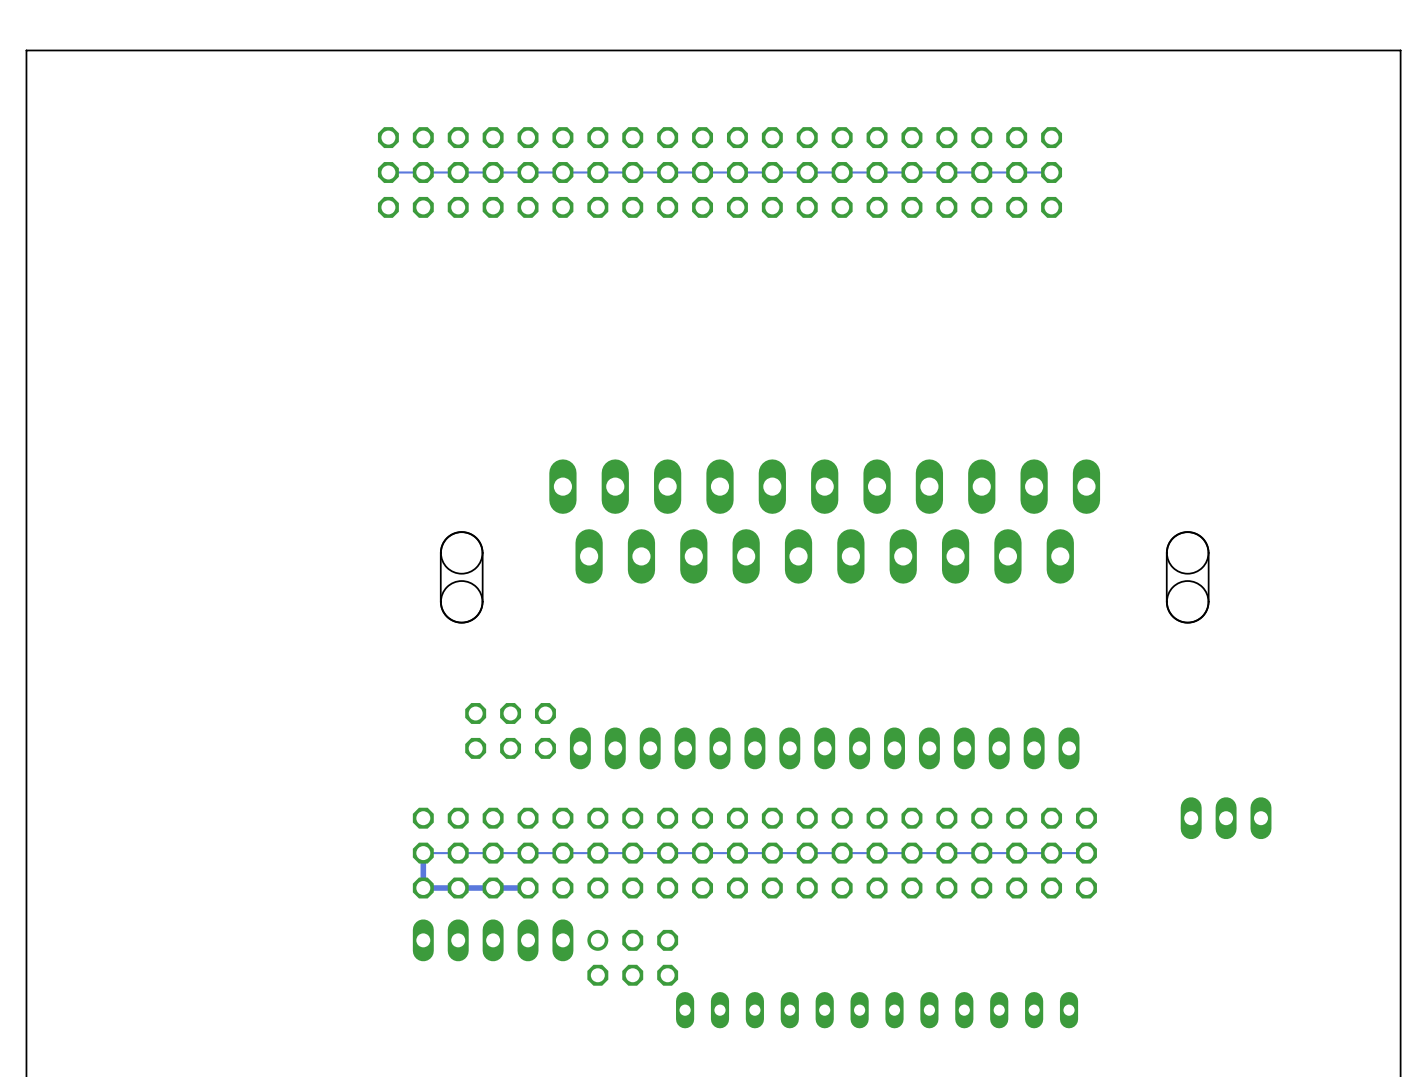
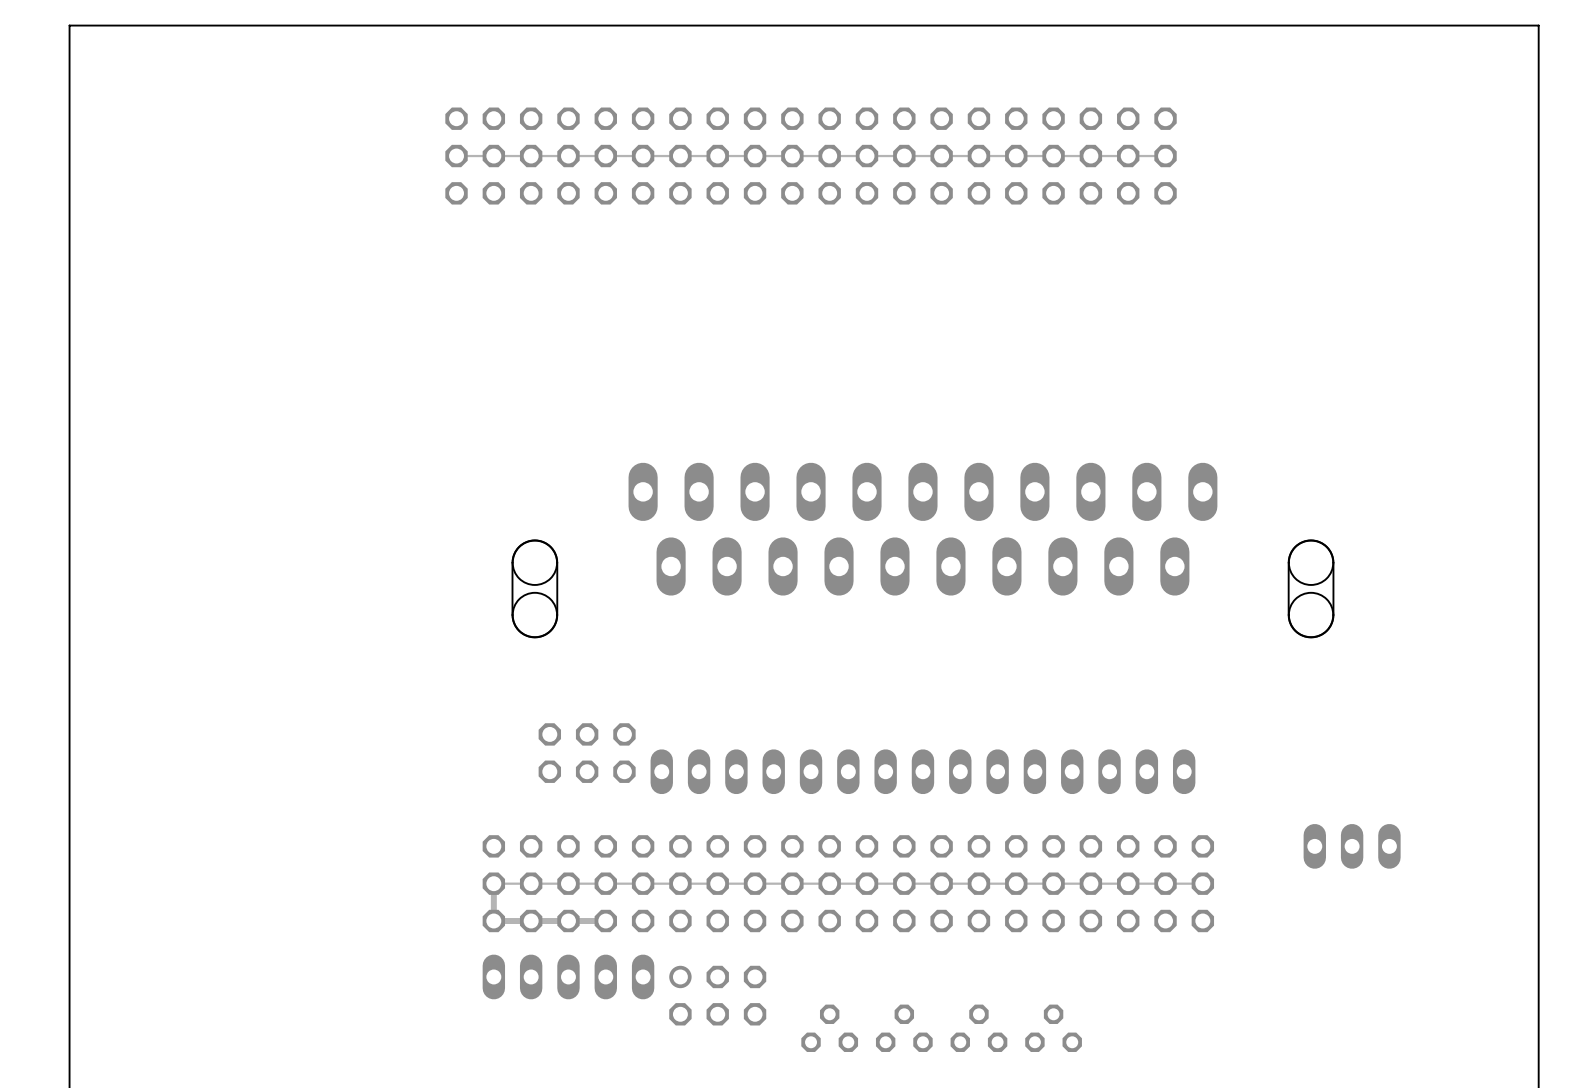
part: none -> (829, 1028)
part: none -> (904, 1028)
part: none -> (978, 1028)
part: none -> (1053, 1028)
part: (719, 1010) -> none
part: (824, 1010) -> none
part: (929, 1010) -> none
part: (1034, 1010) -> none

